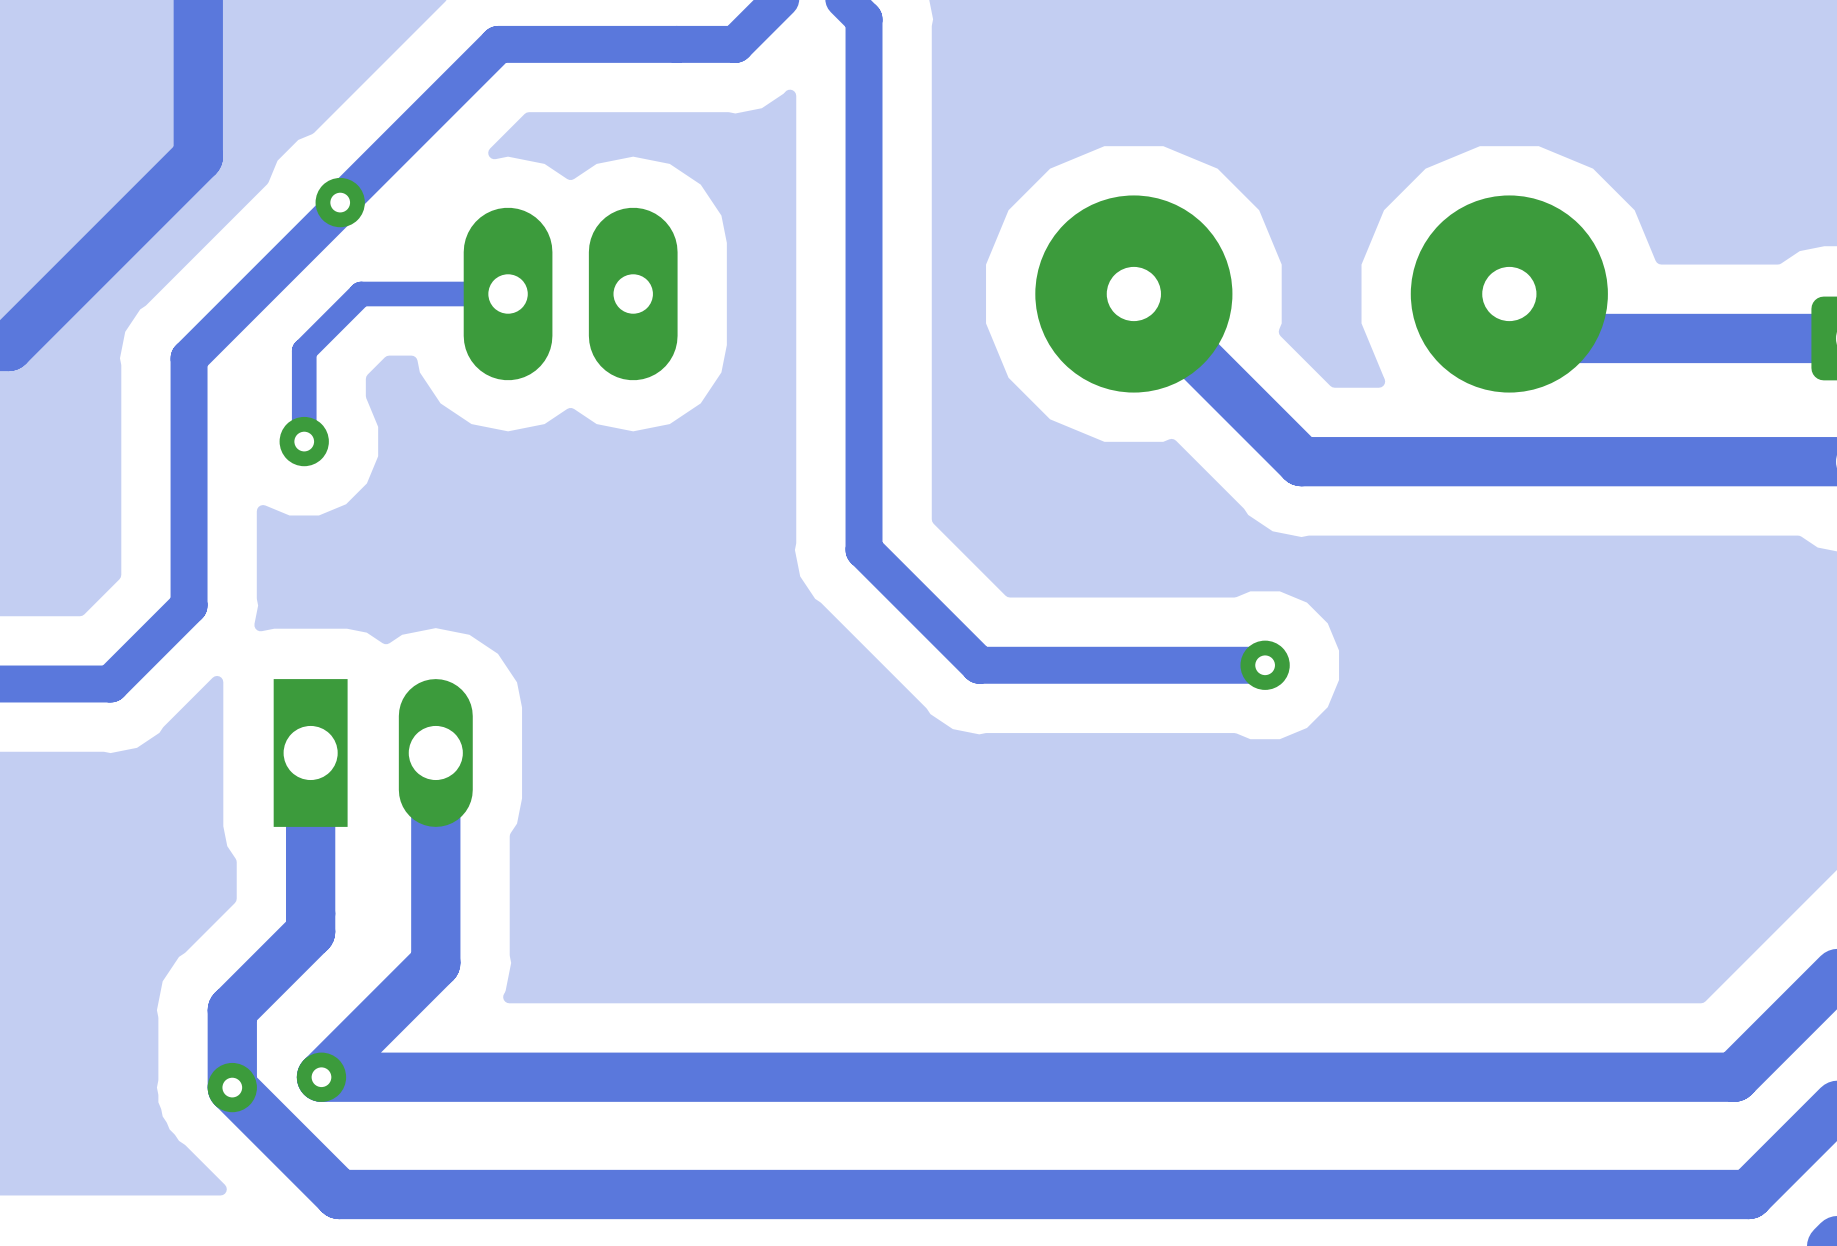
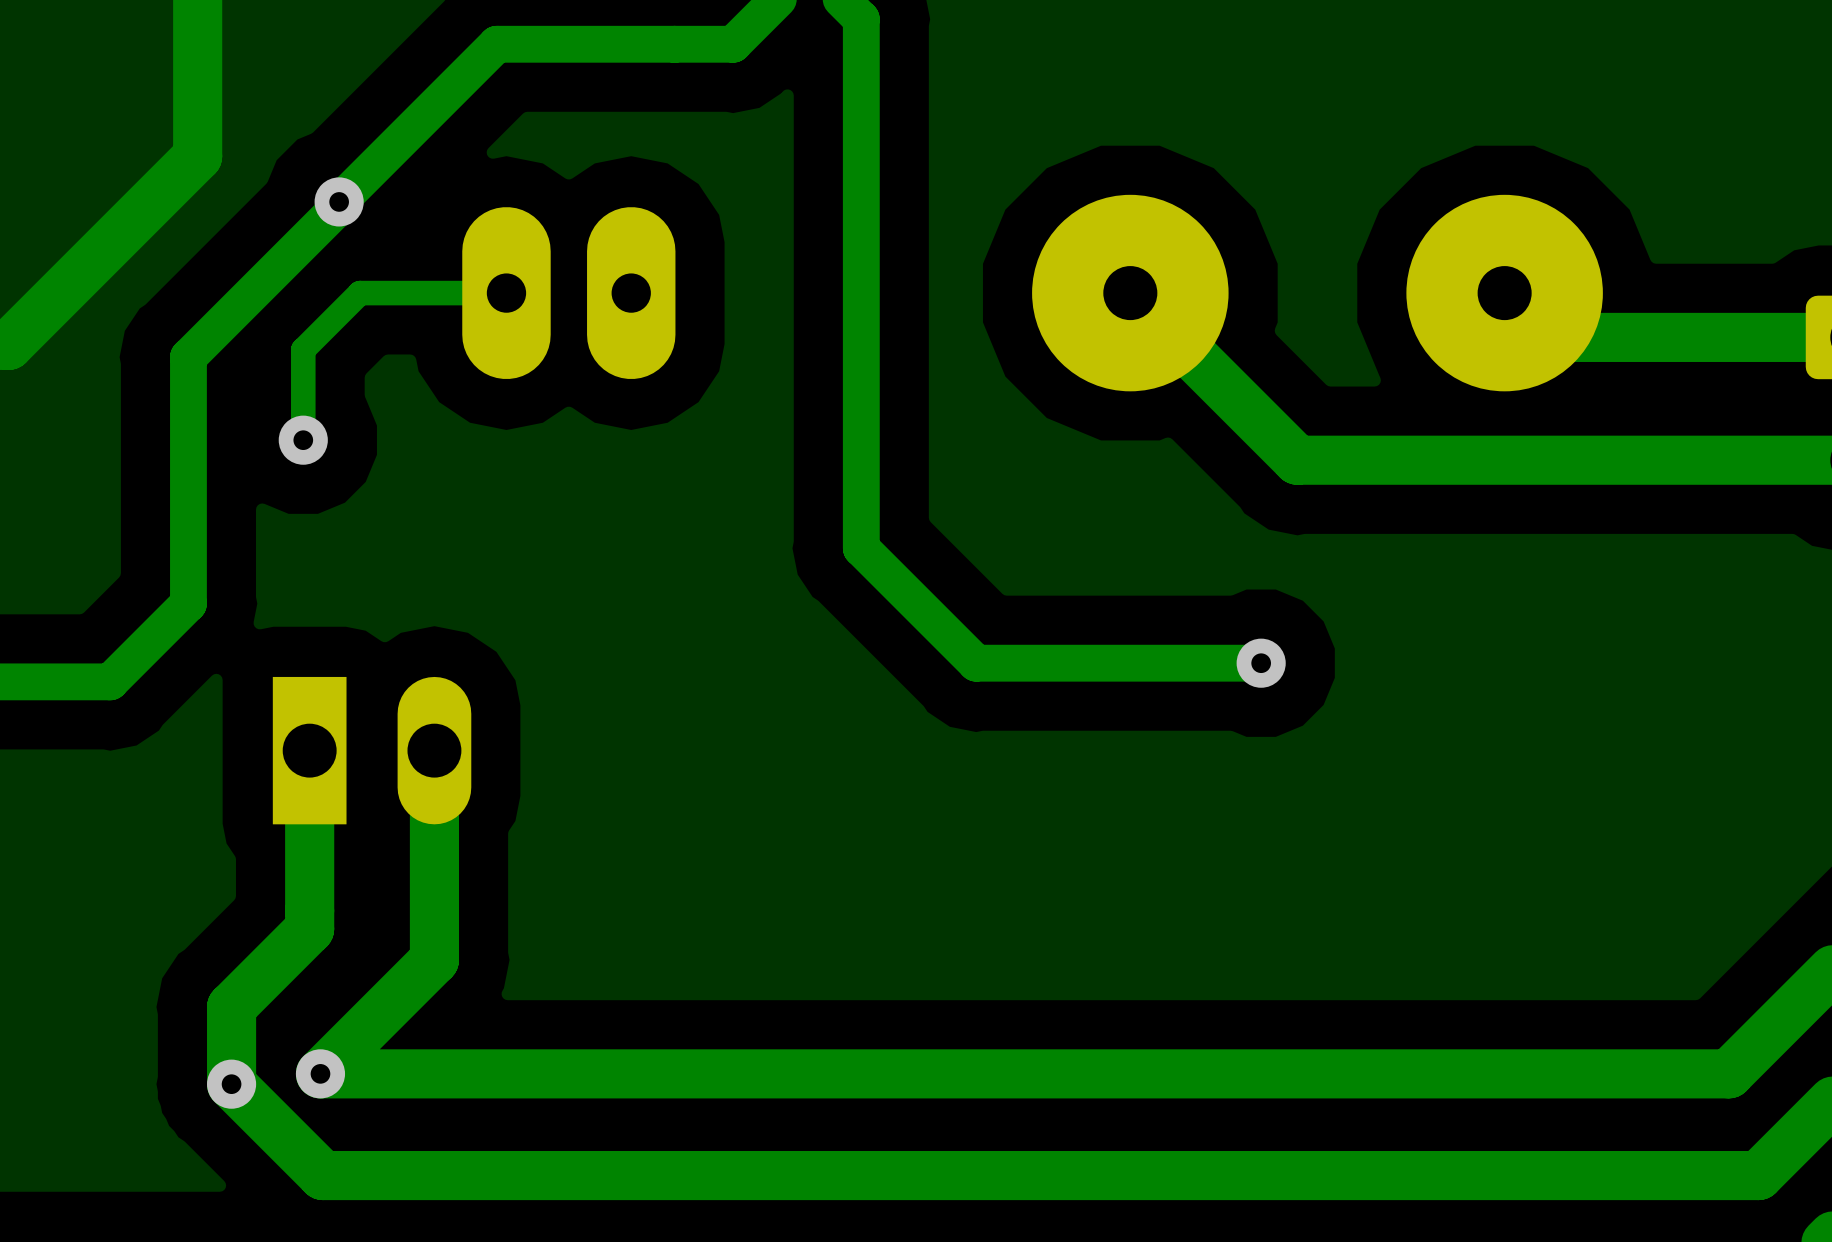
track: (1764, 1179) (1748, 1194) (339, 1194) (323, 1179) -> (1758, 1175) (322, 1175)

